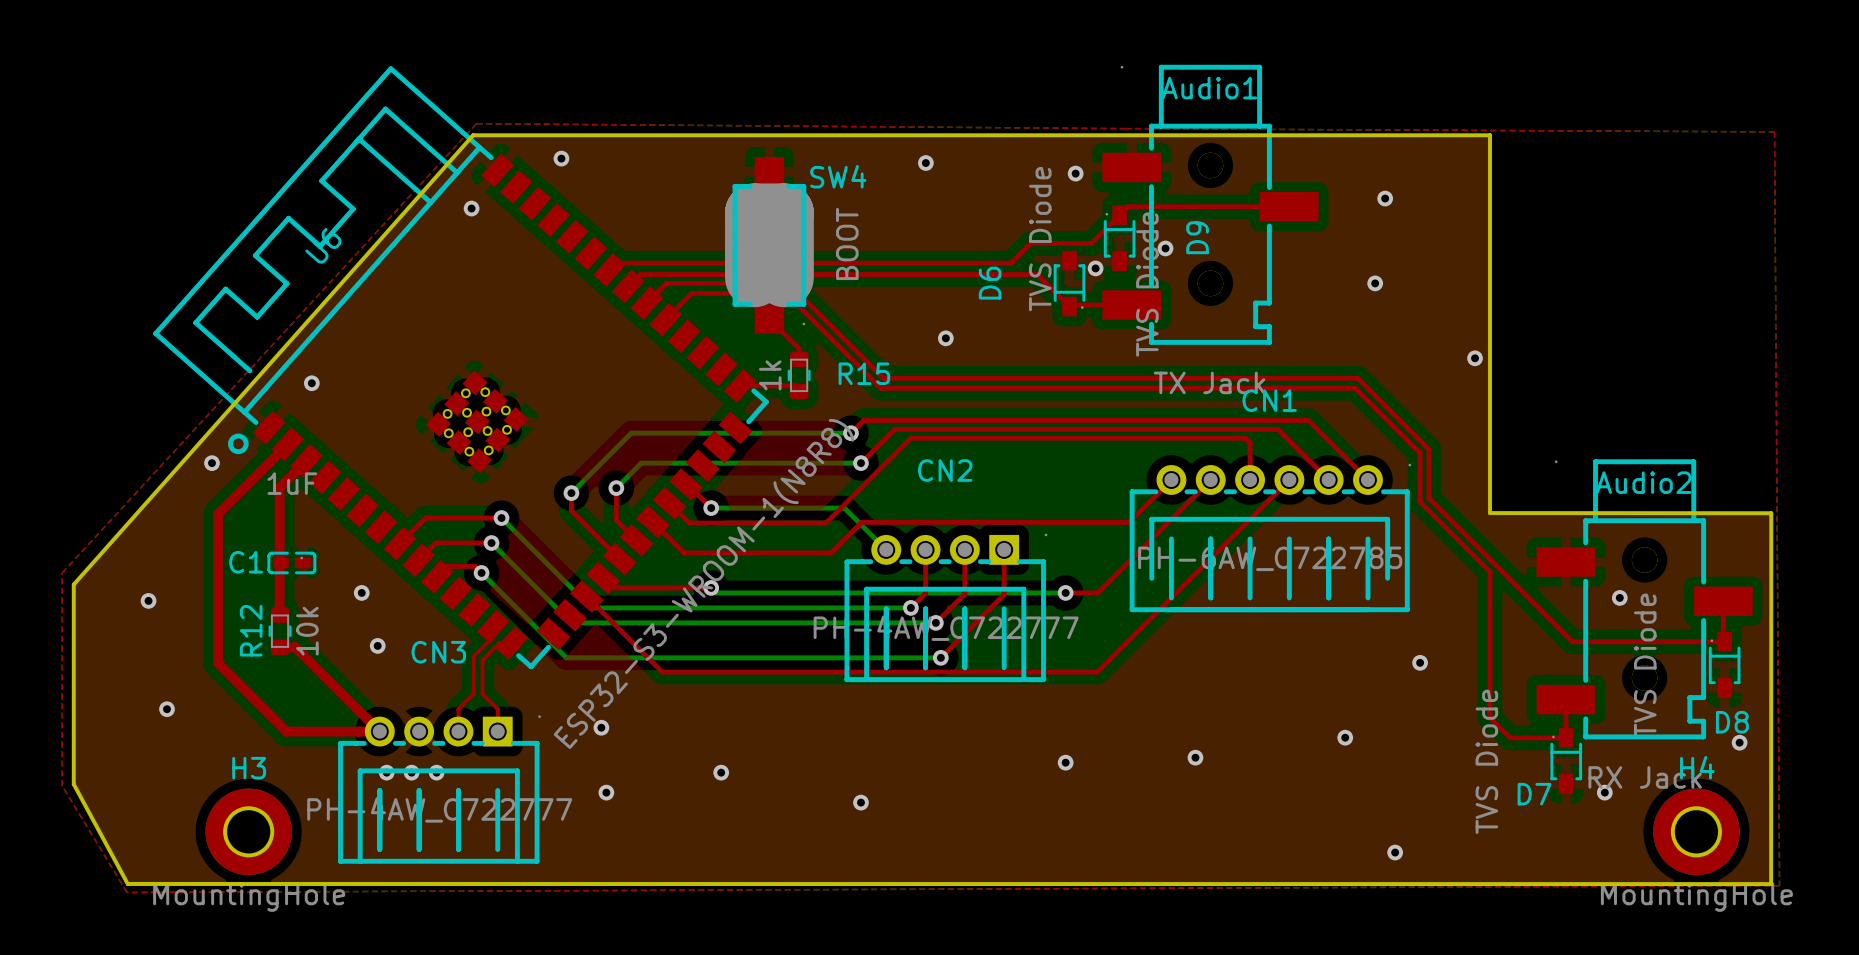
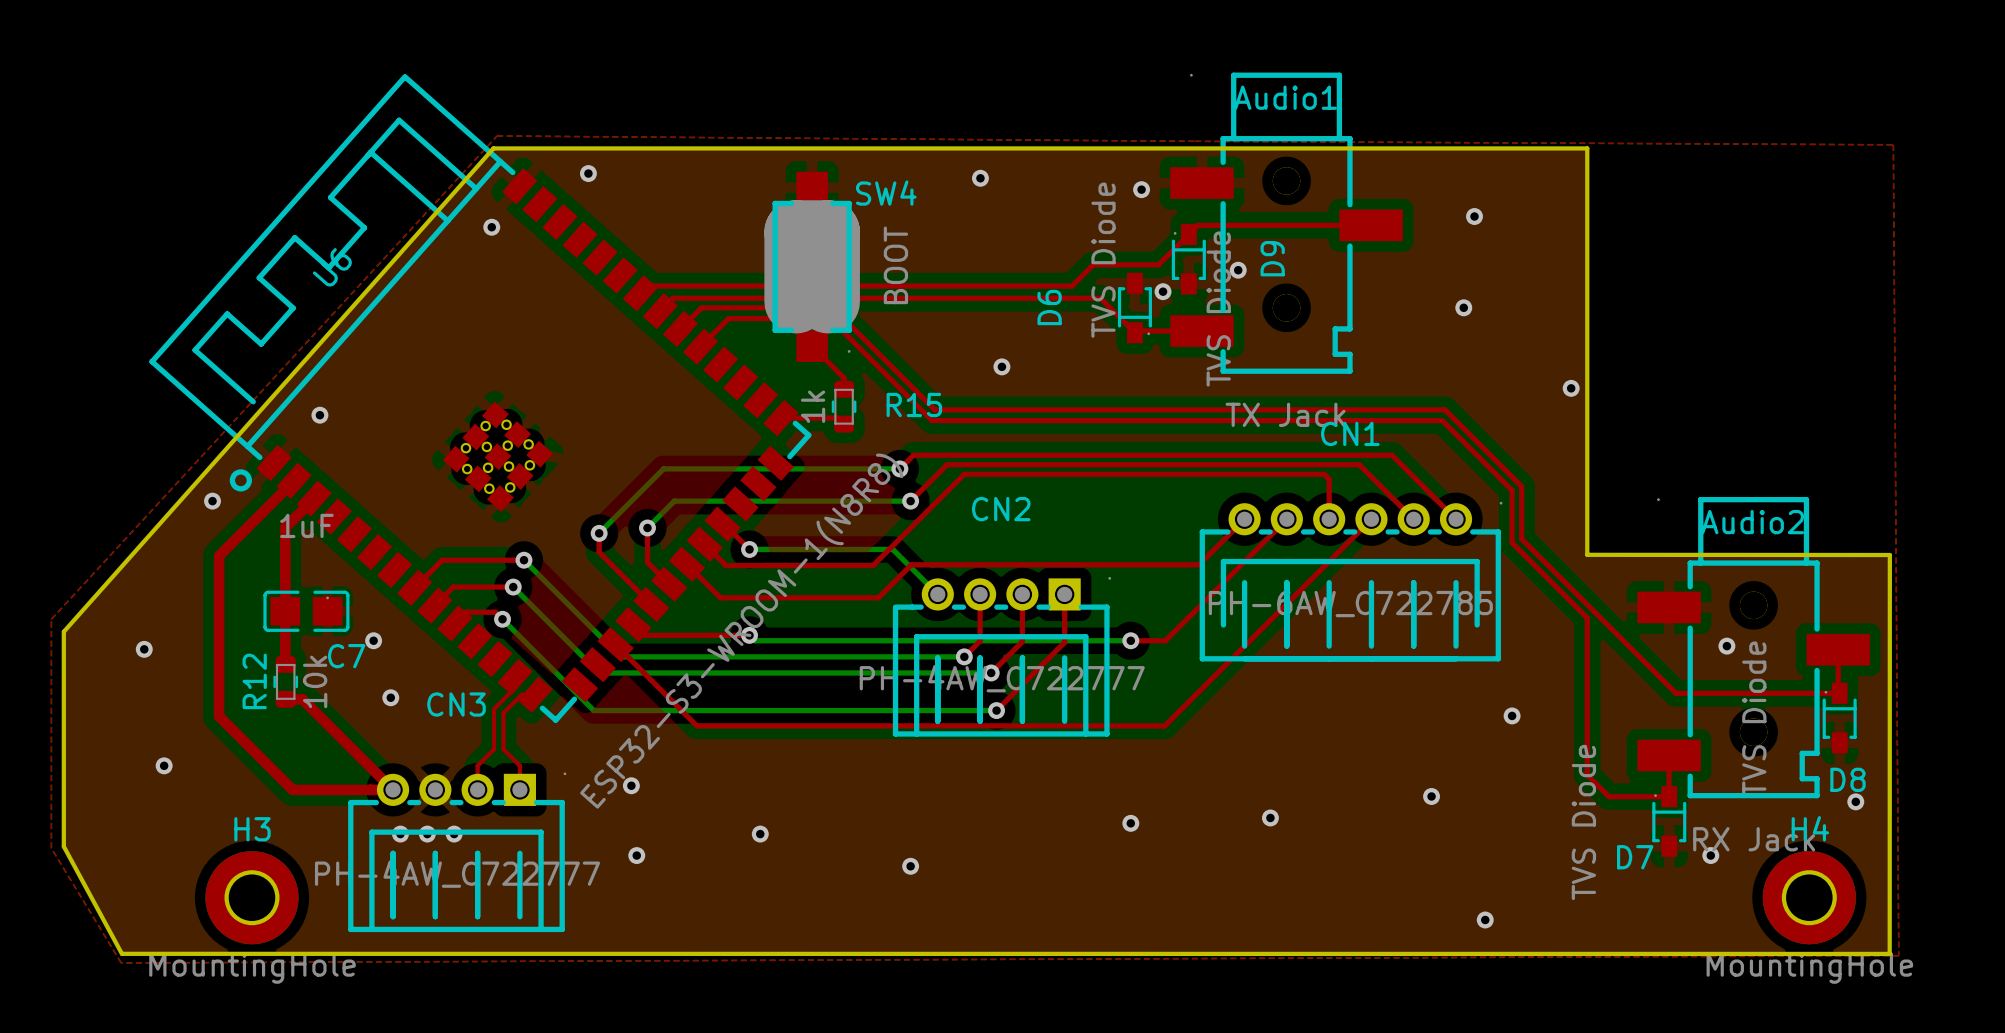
C1: 1uF (291, 562) -> none
C7: none -> 1uF (306, 611)

